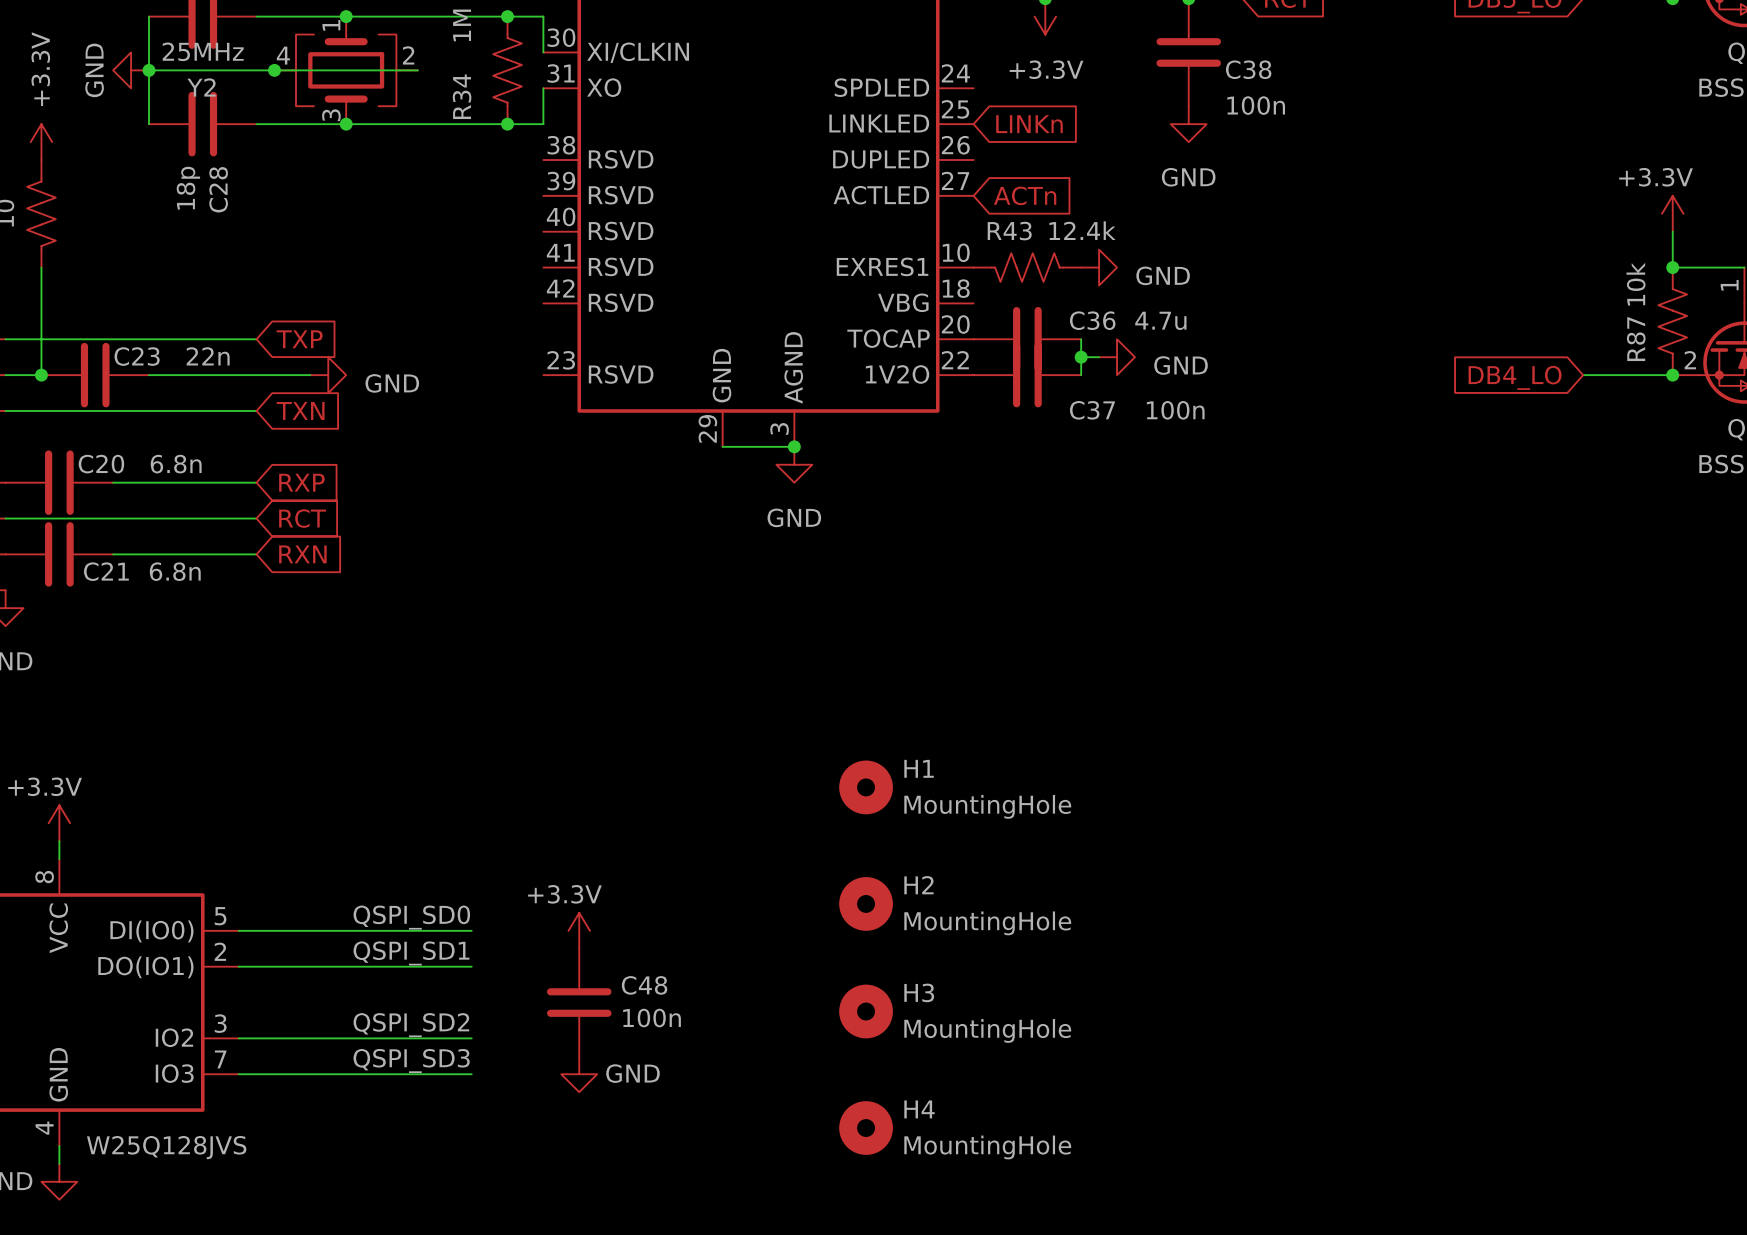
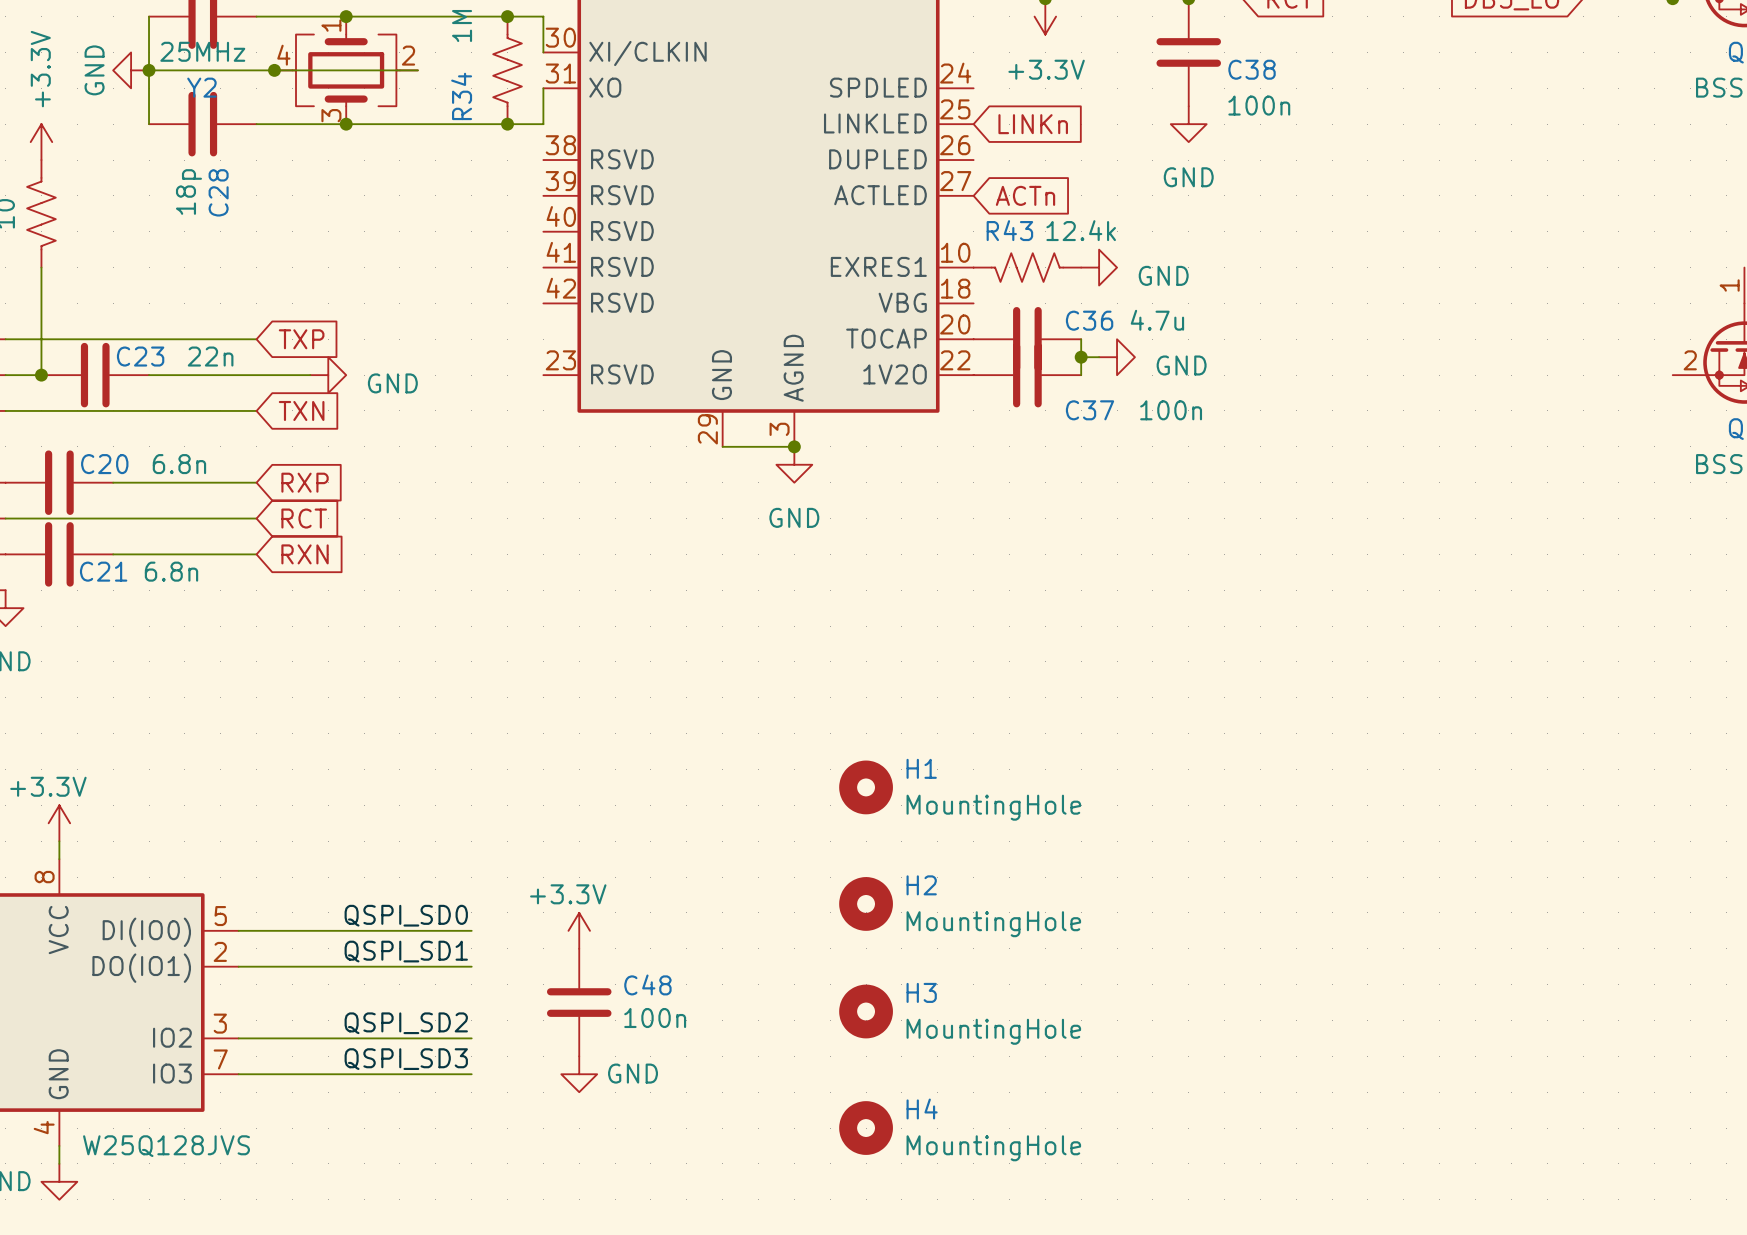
power symbol: +3.3V (1672, 213) -> none
wire: (1672, 231) (1672, 267) (1744, 267) -> none
junction: (1672, 267) -> none
R87: 10k (1672, 321) -> none
wire: (1583, 375) (1672, 375) -> none
junction: (1672, 375) -> none
global label: DB4_LO (1515, 377) -> none

